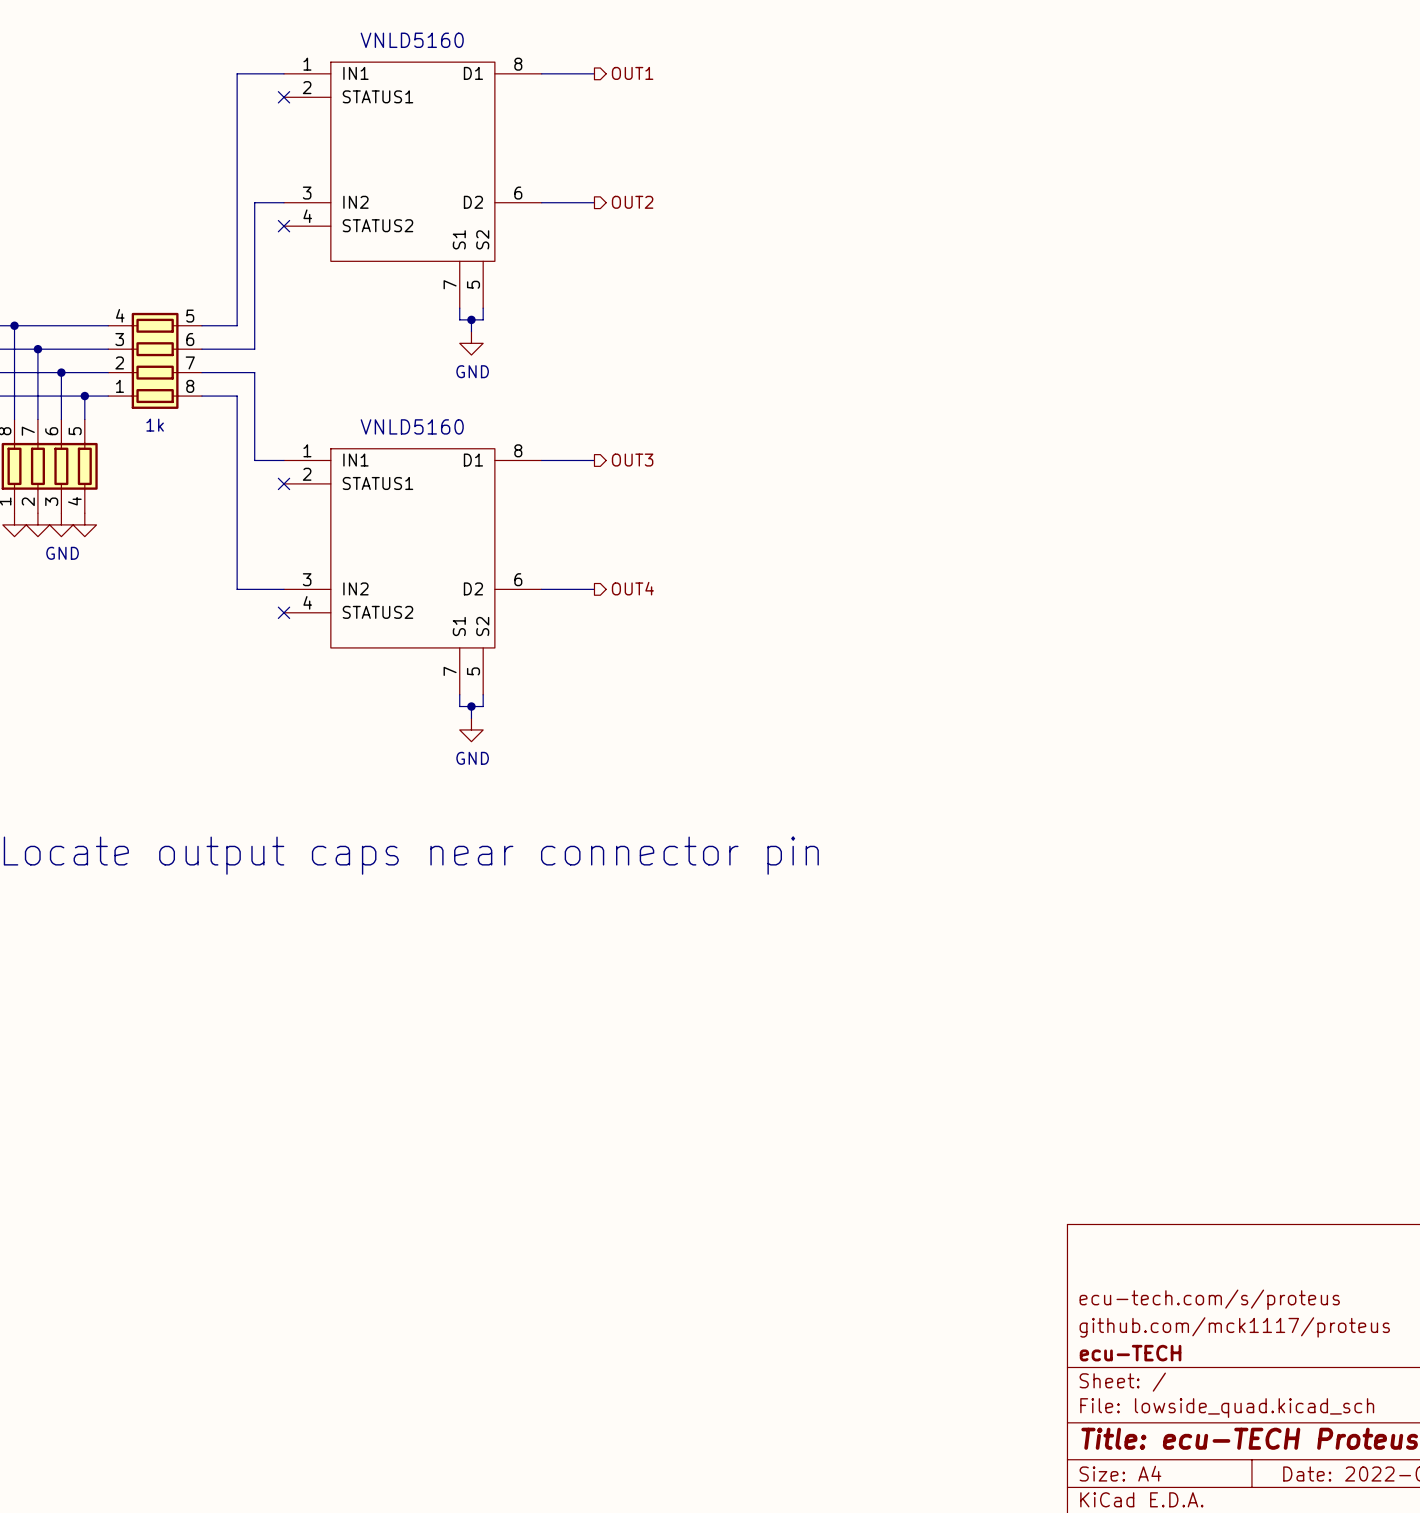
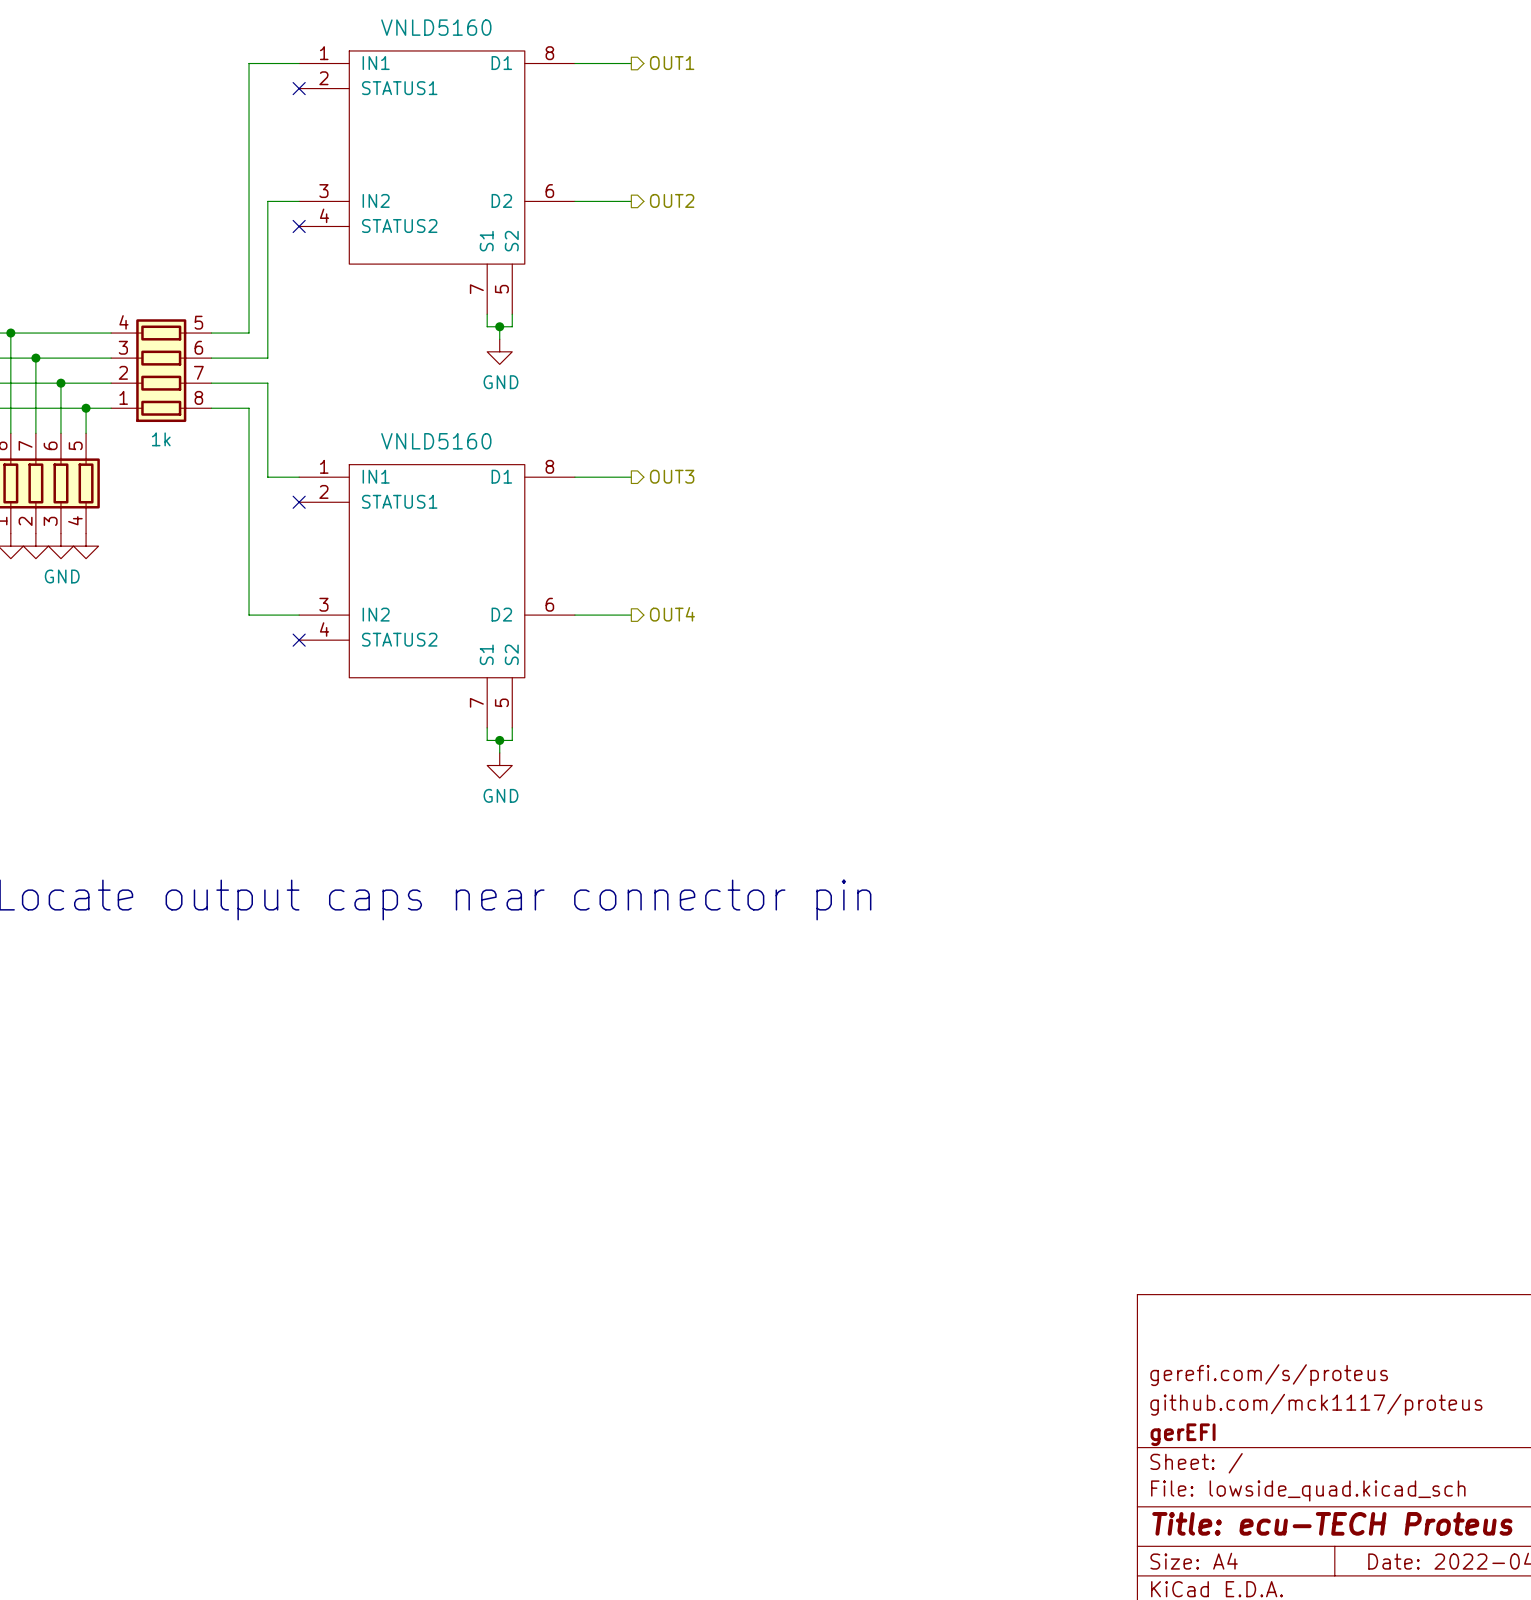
title block: ecu-tech.com/s/proteus (1209, 1299) -> gerefi.com/s/proteus (1269, 1375)
title block: ecu-TECH (1130, 1353) -> gerEFI (1183, 1434)

